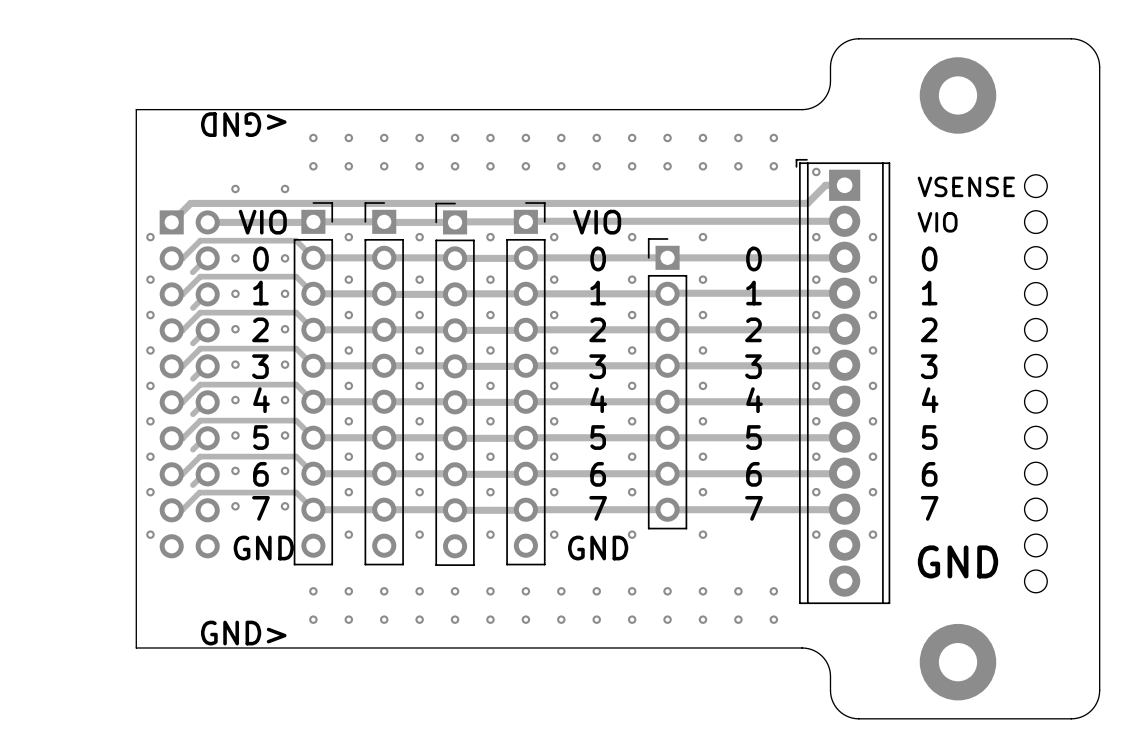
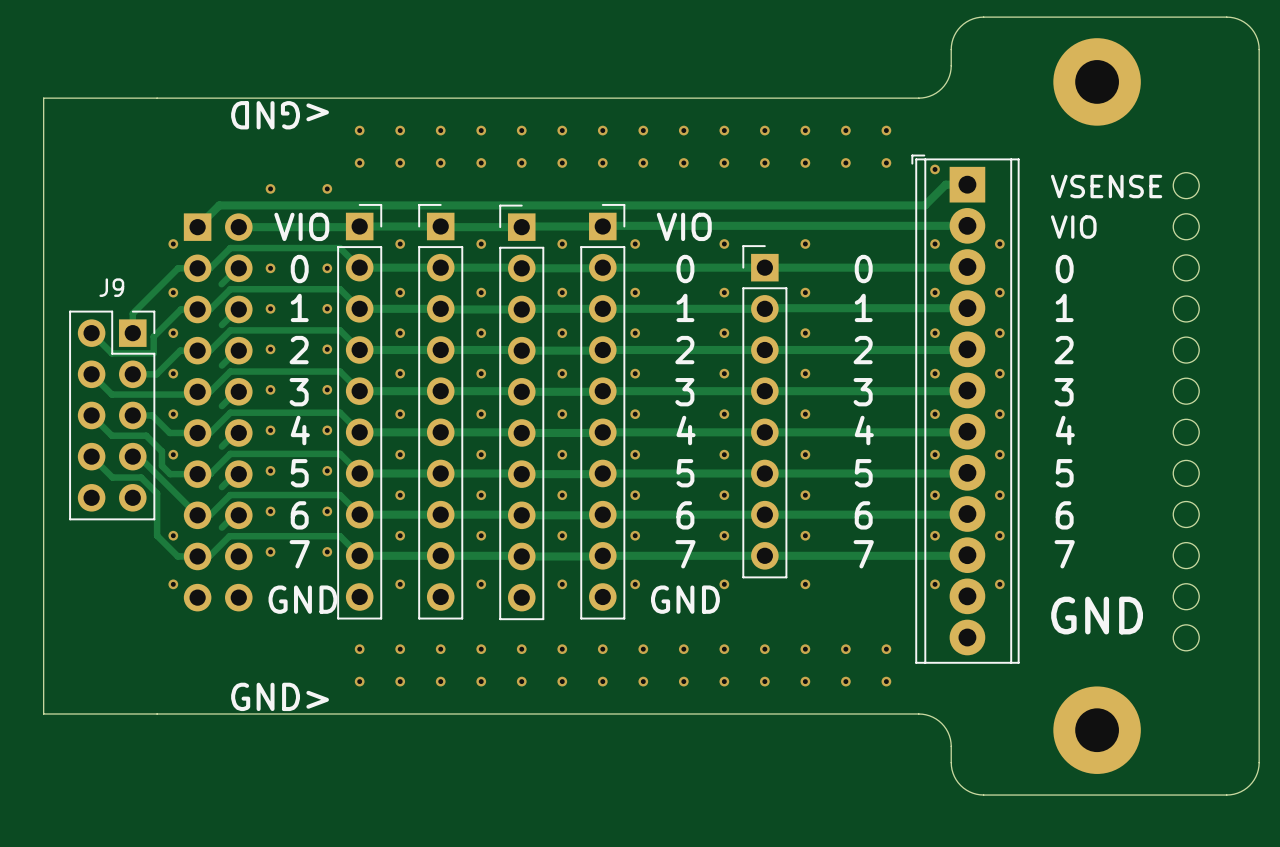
board edge: (136, 109) (136, 647) -> (157, 98) (43, 98) (43, 714) (157, 714)
track: none -> (197, 268) (178, 268) (132, 313) (132, 333)
track: none -> (197, 309) (180, 309) (153, 336) (153, 353) (111, 353) (91, 333)
track: none -> (197, 350) (180, 350) (156, 374) (132, 374)
track: none -> (91, 374) (111, 394) (194, 394) (197, 391)
track: none -> (91, 415) (111, 435) (146, 435) (161, 451) (161, 465) (170, 474) (197, 474)
J9: none -> (112, 415)
track: none -> (132, 415) (152, 415) (169, 432) (197, 432)
track: none -> (91, 456) (112, 477) (141, 477) (157, 493) (157, 535) (177, 556) (197, 556)
track: none -> (132, 456) (138, 456) (197, 515)
via: (150, 456) -> none

